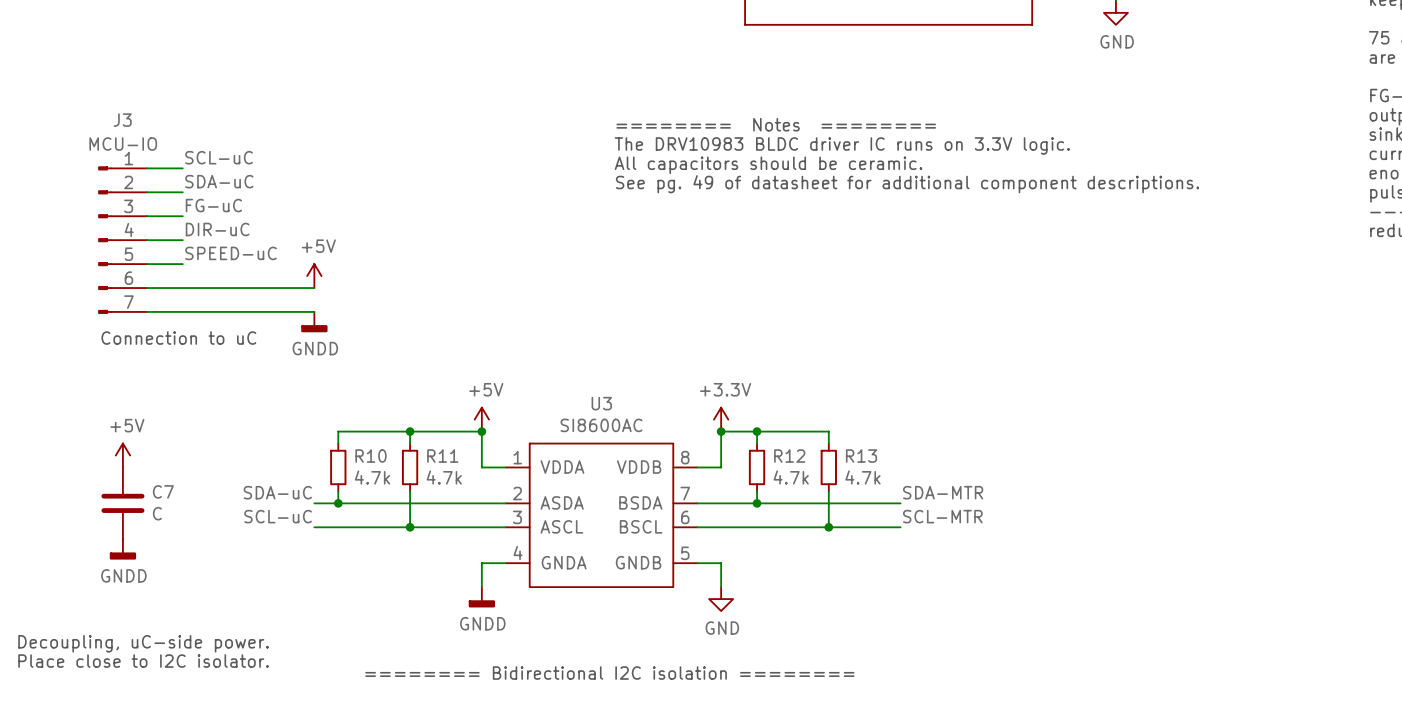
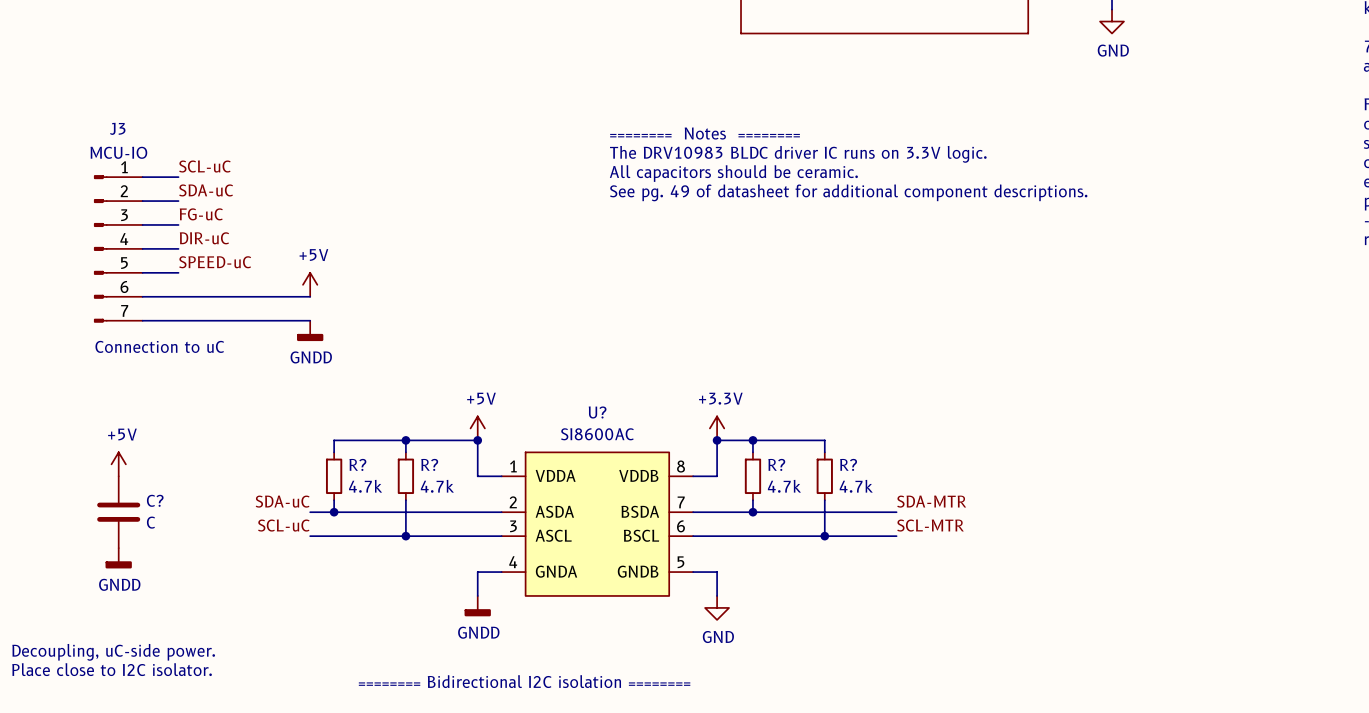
U3 name: U3 (601, 403) -> U? (597, 412)
R10 name: R10 (371, 456) -> R? (357, 464)
R11 name: R11 (442, 456) -> R? (429, 464)
R12 name: R12 (789, 456) -> R? (776, 464)
R13 name: R13 (861, 456) -> R? (848, 464)
C7 name: C7 (163, 491) -> C? (155, 500)

